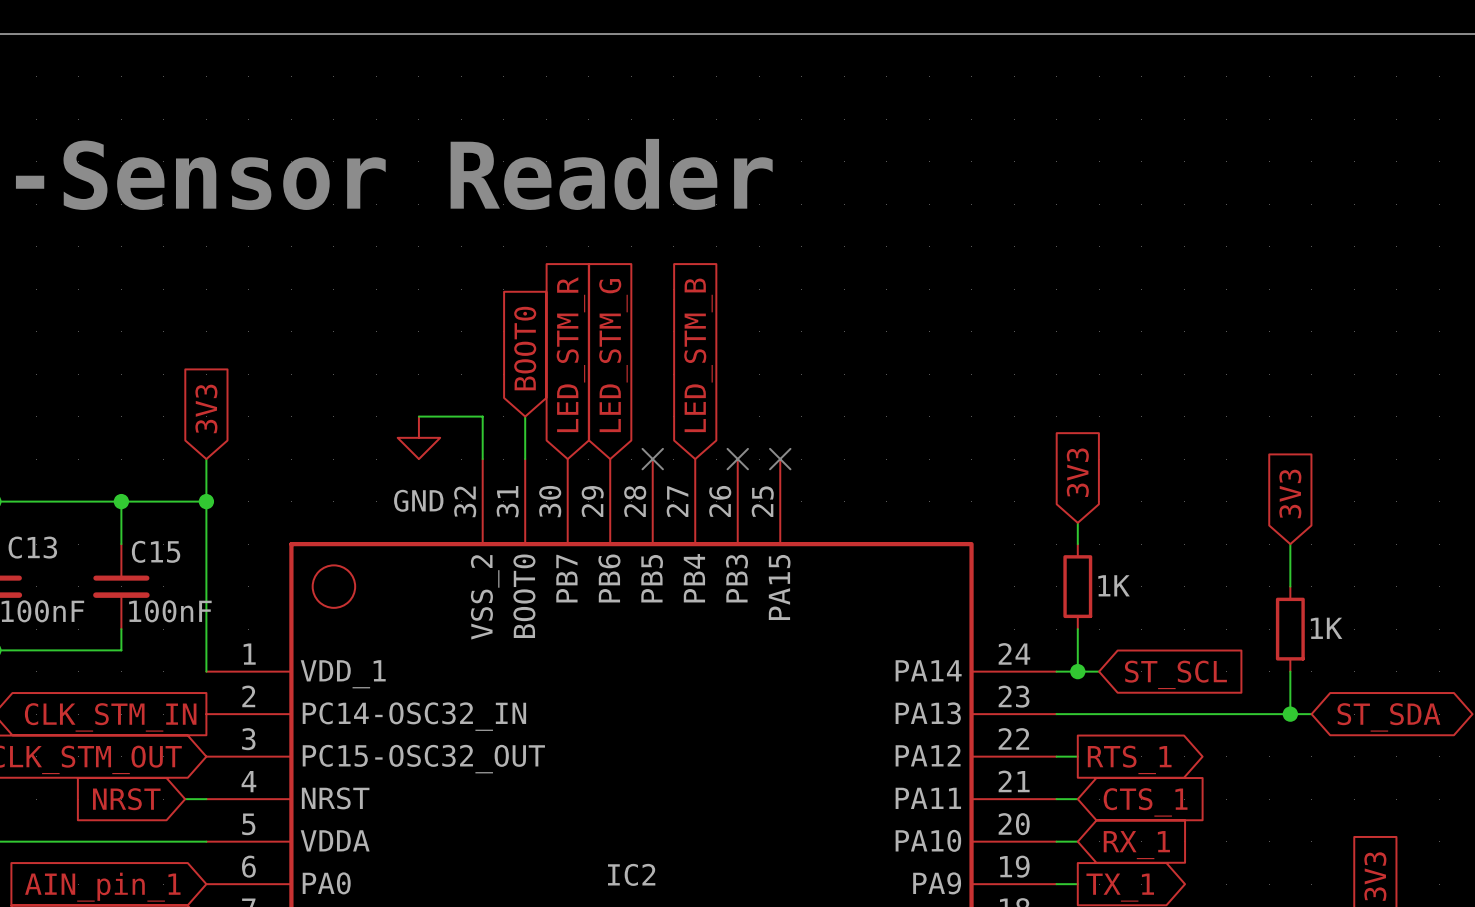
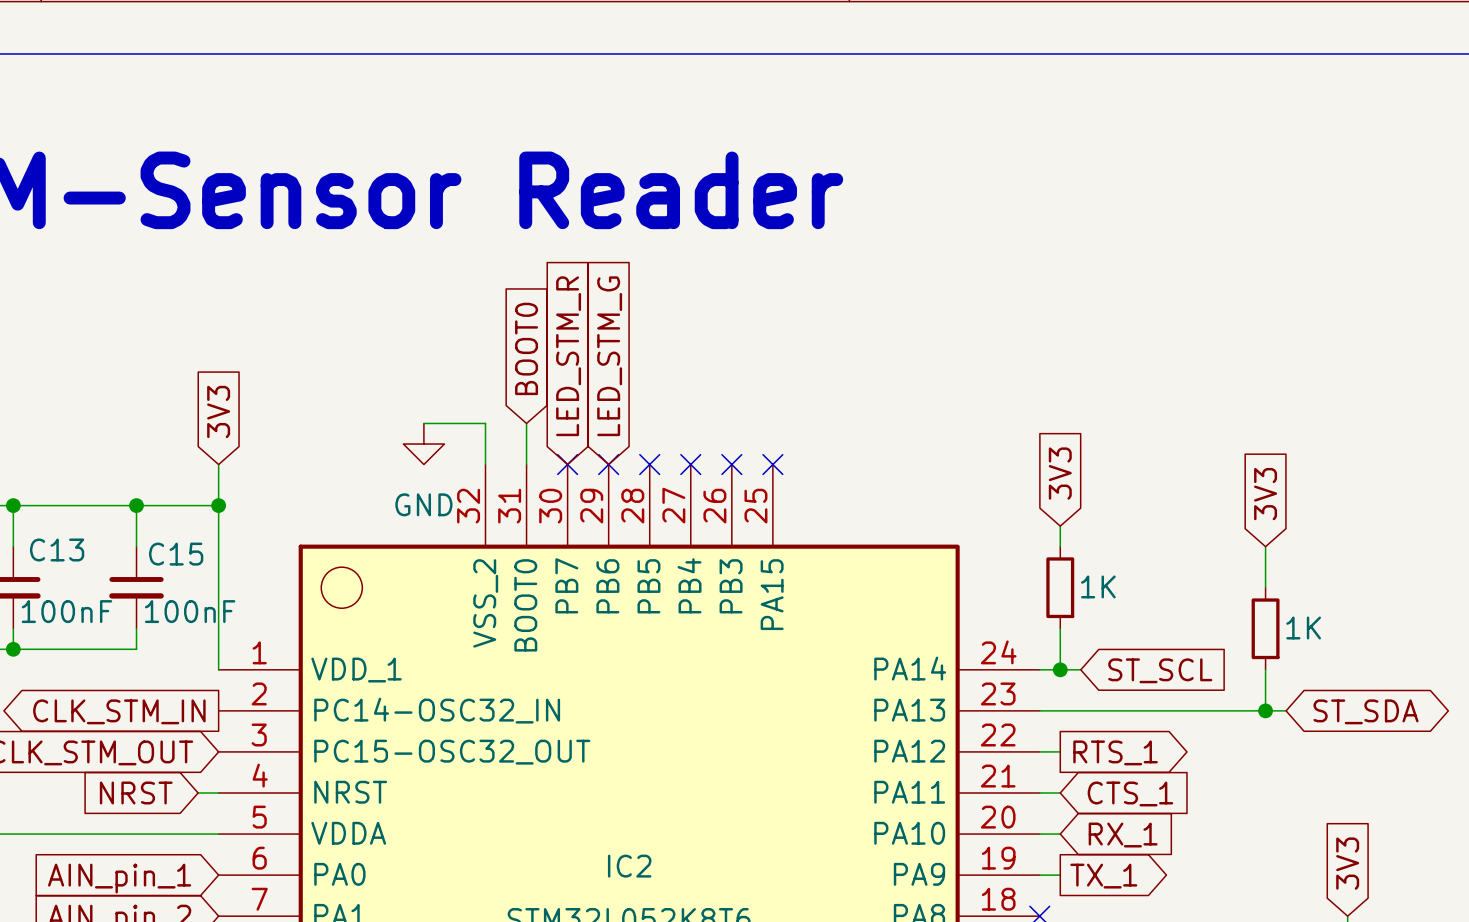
global label: LED_STM_B (698, 355) -> none
no-connect mark: none -> (567, 464)
no-connect mark: none -> (608, 464)
no-connect mark: none -> (690, 464)

